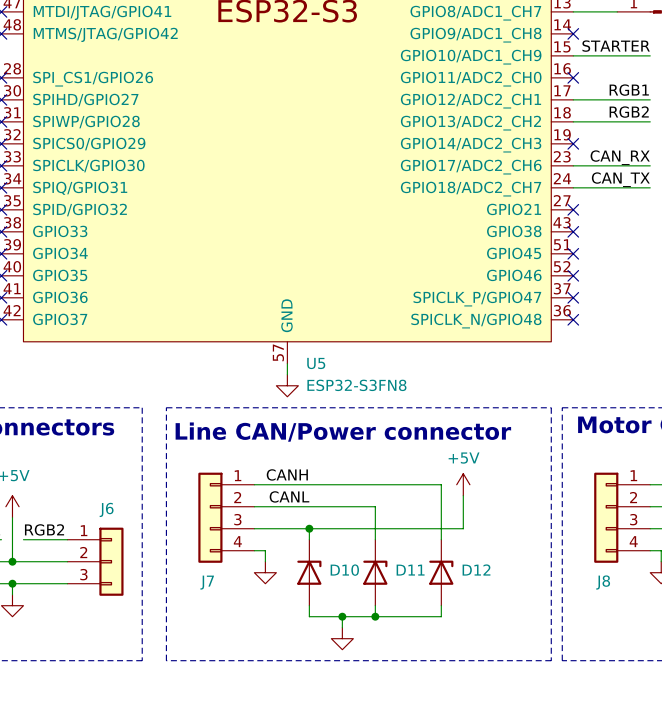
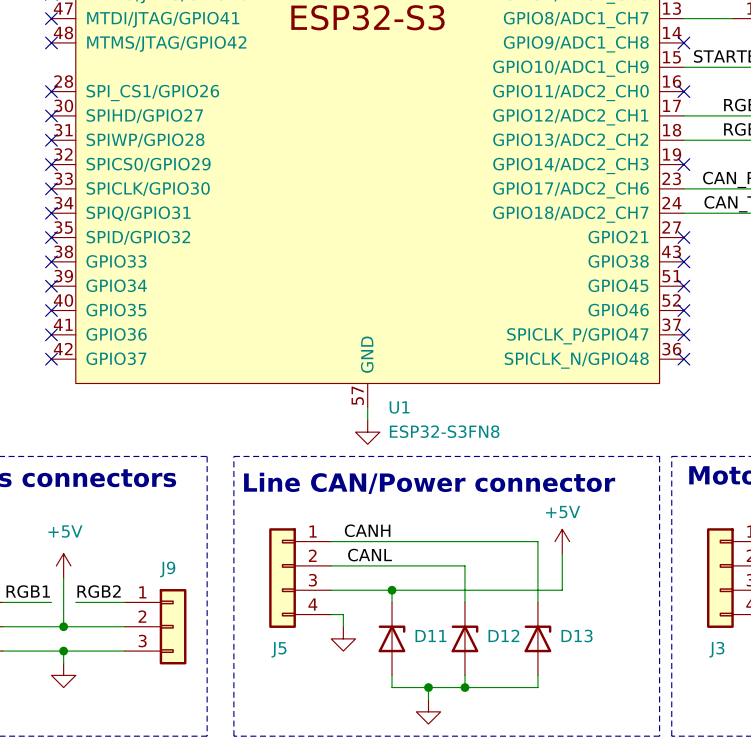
U5 name: U5 (316, 363) -> U1 (399, 407)
J6 name: J6 (106, 509) -> J9 (167, 569)
D10 name: D10 (344, 570) -> D11 (430, 636)
D11 name: D11 (410, 570) -> D12 (503, 635)
D12 name: D12 (476, 570) -> D13 (577, 636)
J7 name: J7 (207, 582) -> J5 (278, 649)
J8 name: J8 (603, 582) -> J3 (716, 649)

